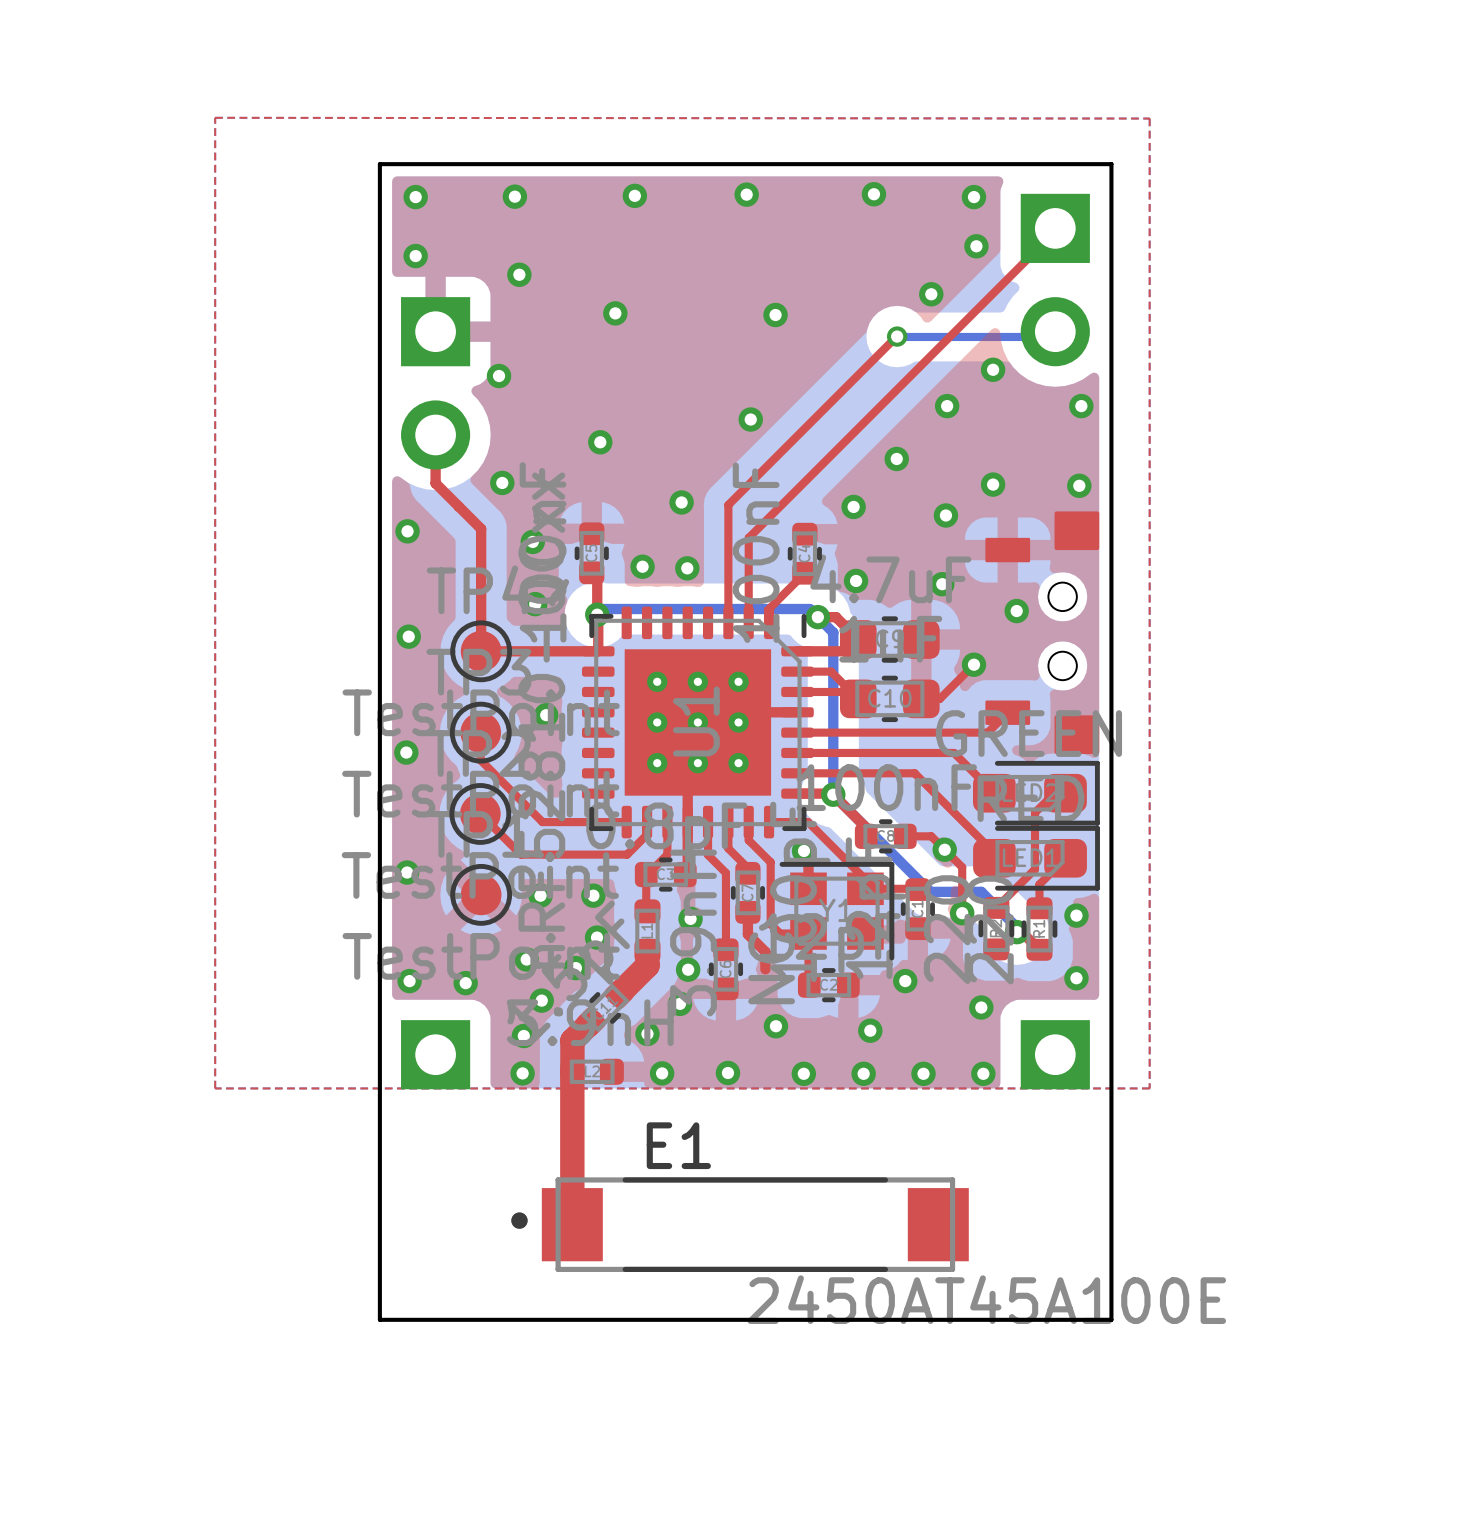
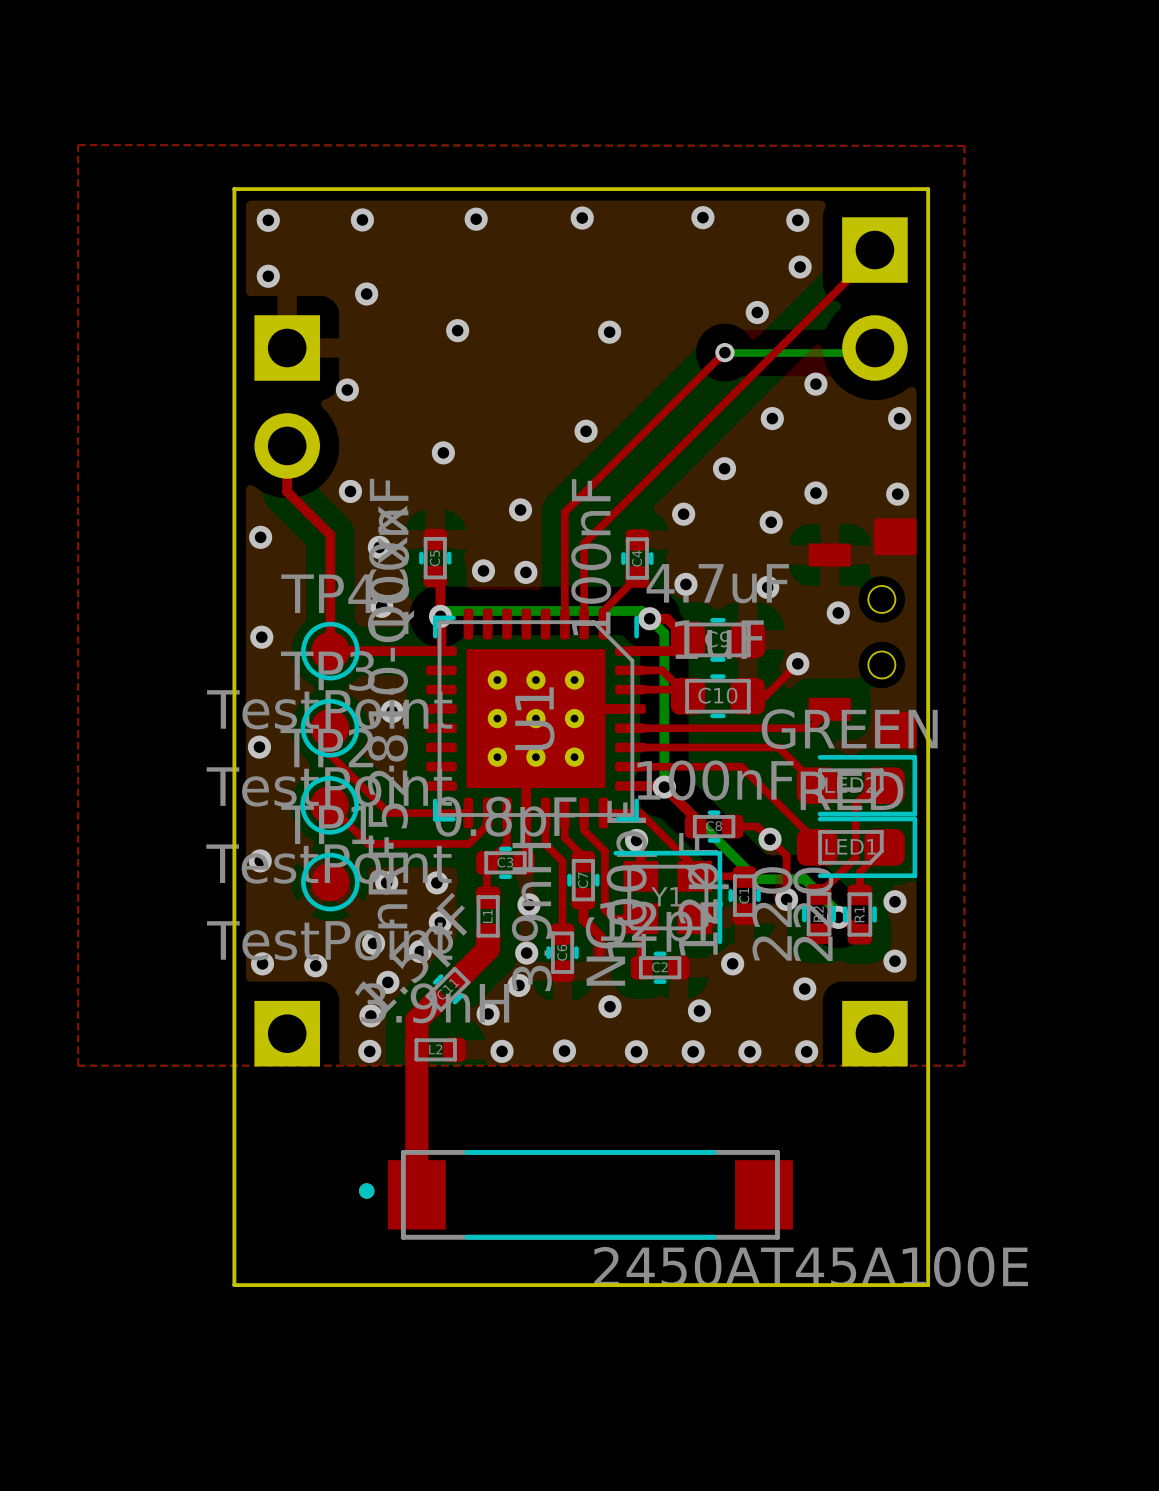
E1 name: E1 (678, 1145) -> none

